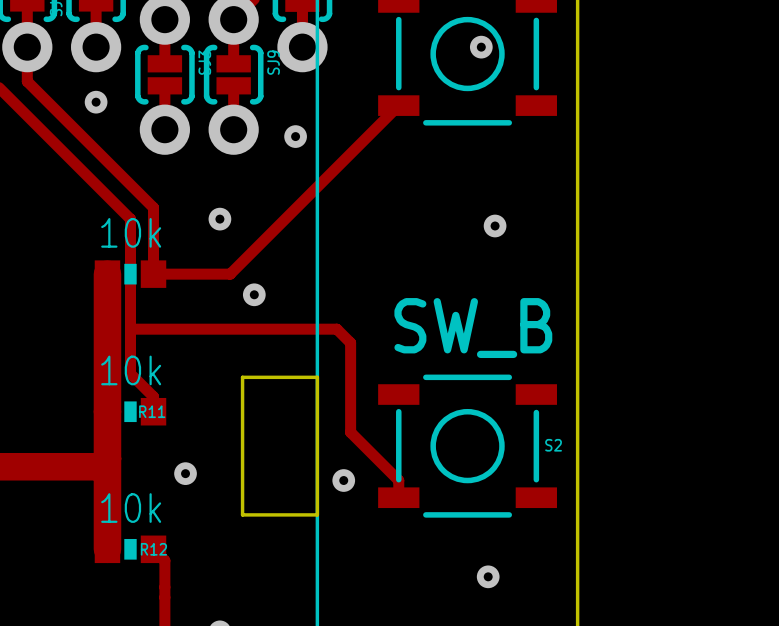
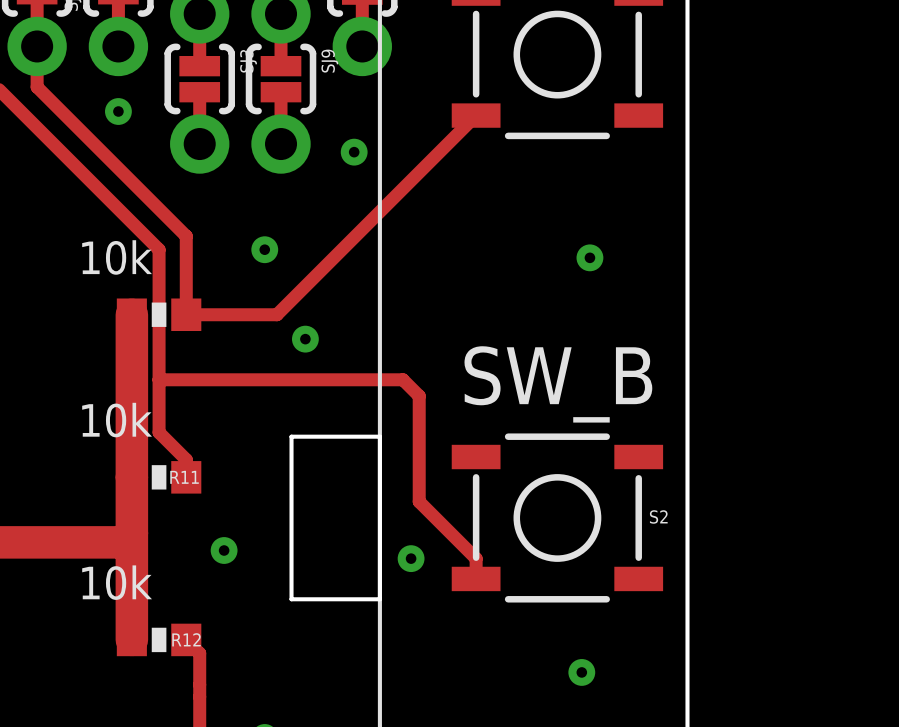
via: (481, 47) -> none
text position: 10k (131, 232) -> 10k (117, 257)
text position: 10k (131, 370) -> 10k (117, 420)
text position: 10k (131, 508) -> 10k (117, 582)

